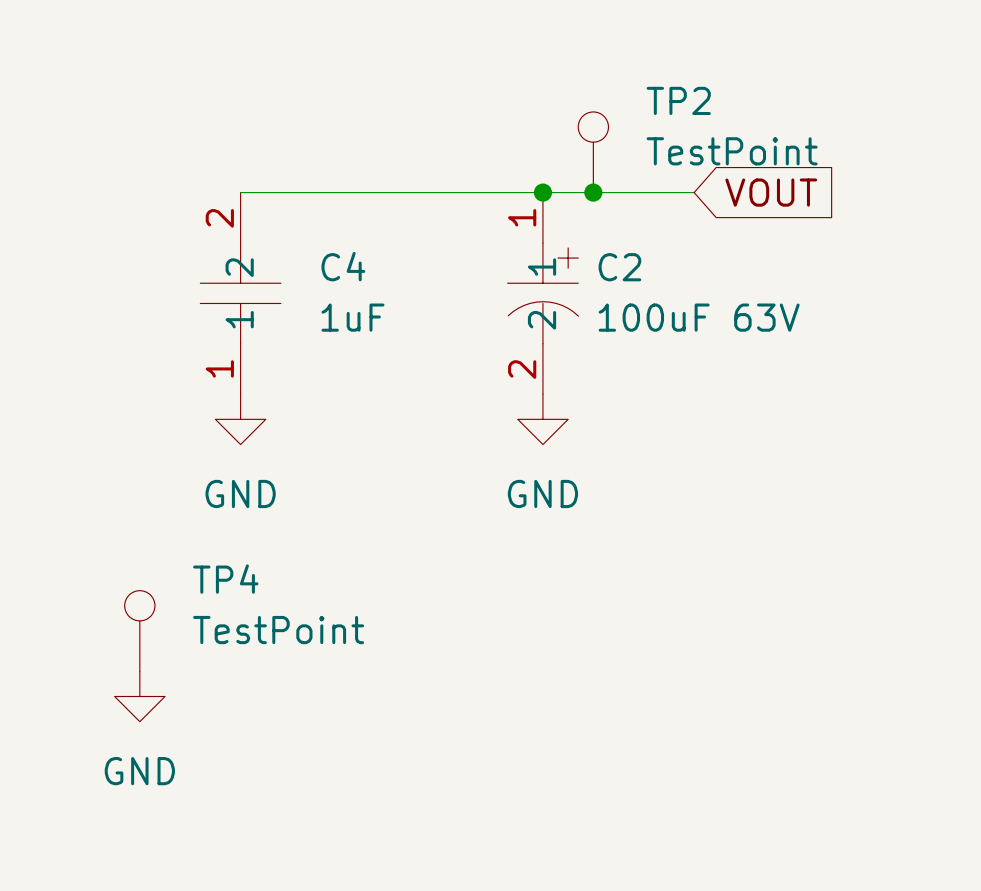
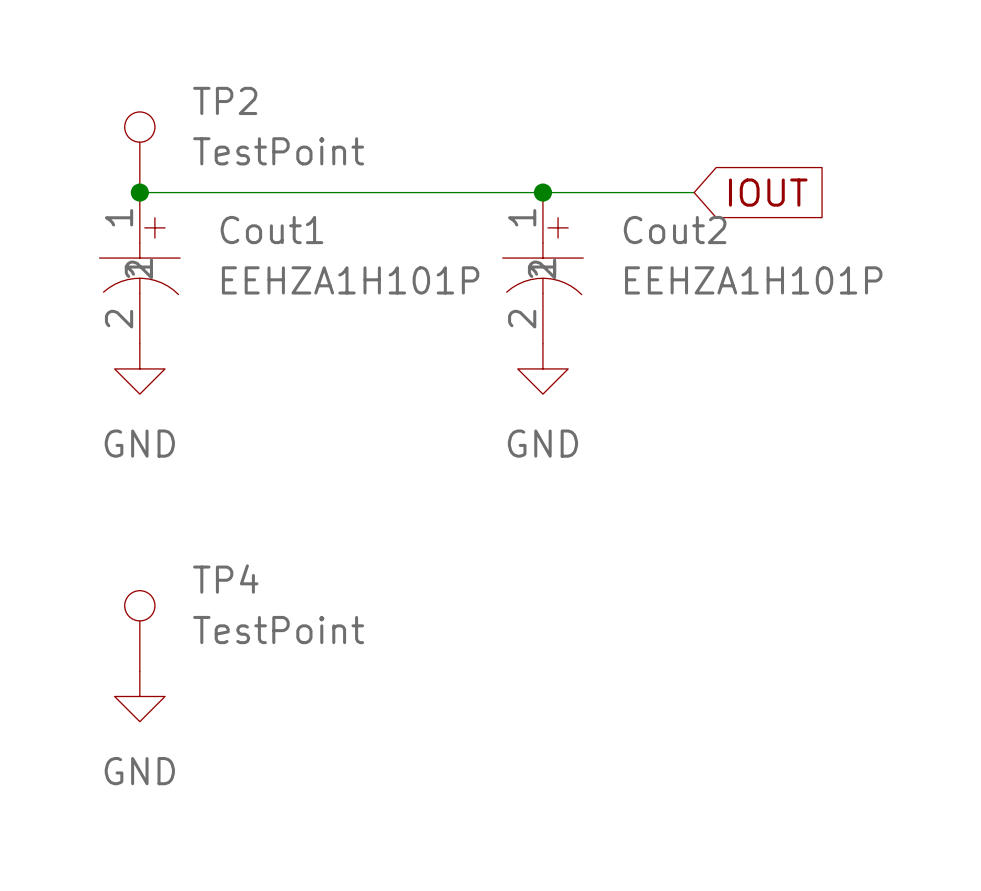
TP2 position: (593, 152) -> (139, 152)
wire: none -> (139, 192) (240, 192)
junction: none -> (139, 192)
junction: (593, 192) -> none
global label: VOUT (771, 192) -> IOUT (768, 192)
Cout1: none -> EEHZA1H101P (139, 268)
Cout2: none -> EEHZA1H101P (542, 268)
C4: 1uF (240, 293) -> none
C2: 100uF 63V (543, 293) -> none
power symbol position: GND (240, 419) -> GND (139, 368)
power symbol position: GND (542, 419) -> GND (542, 368)

